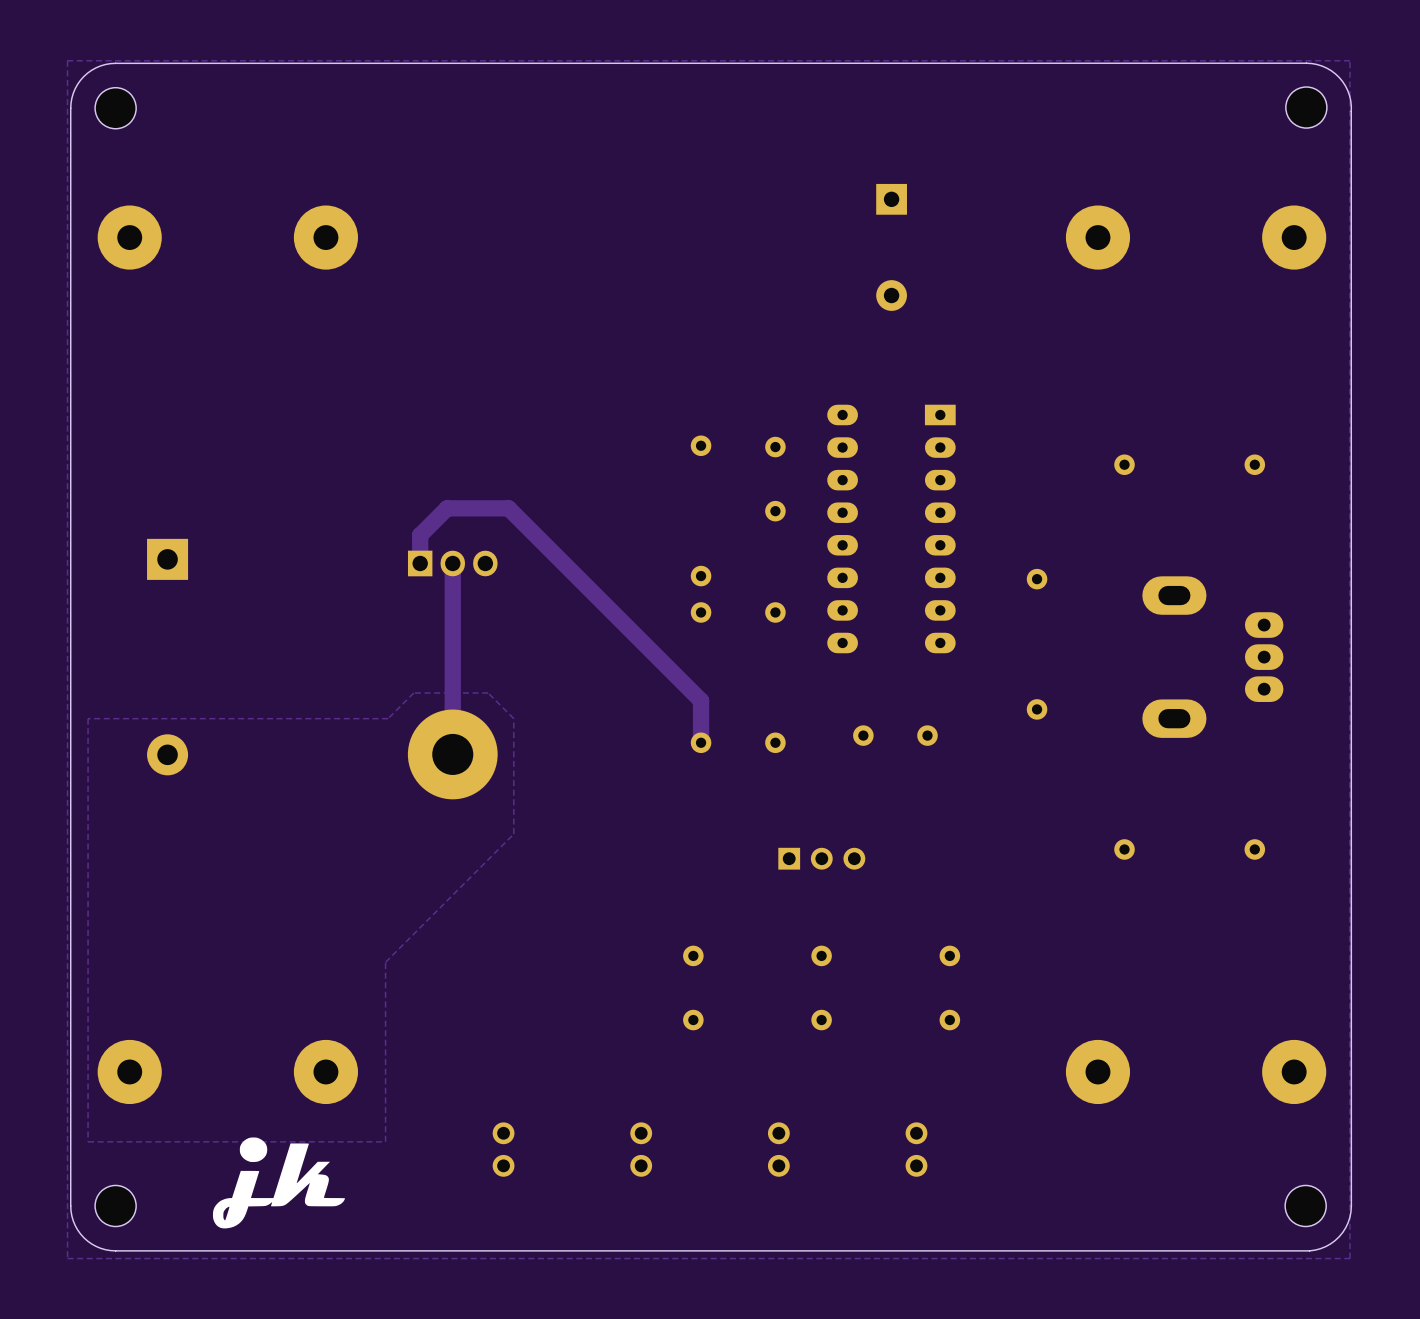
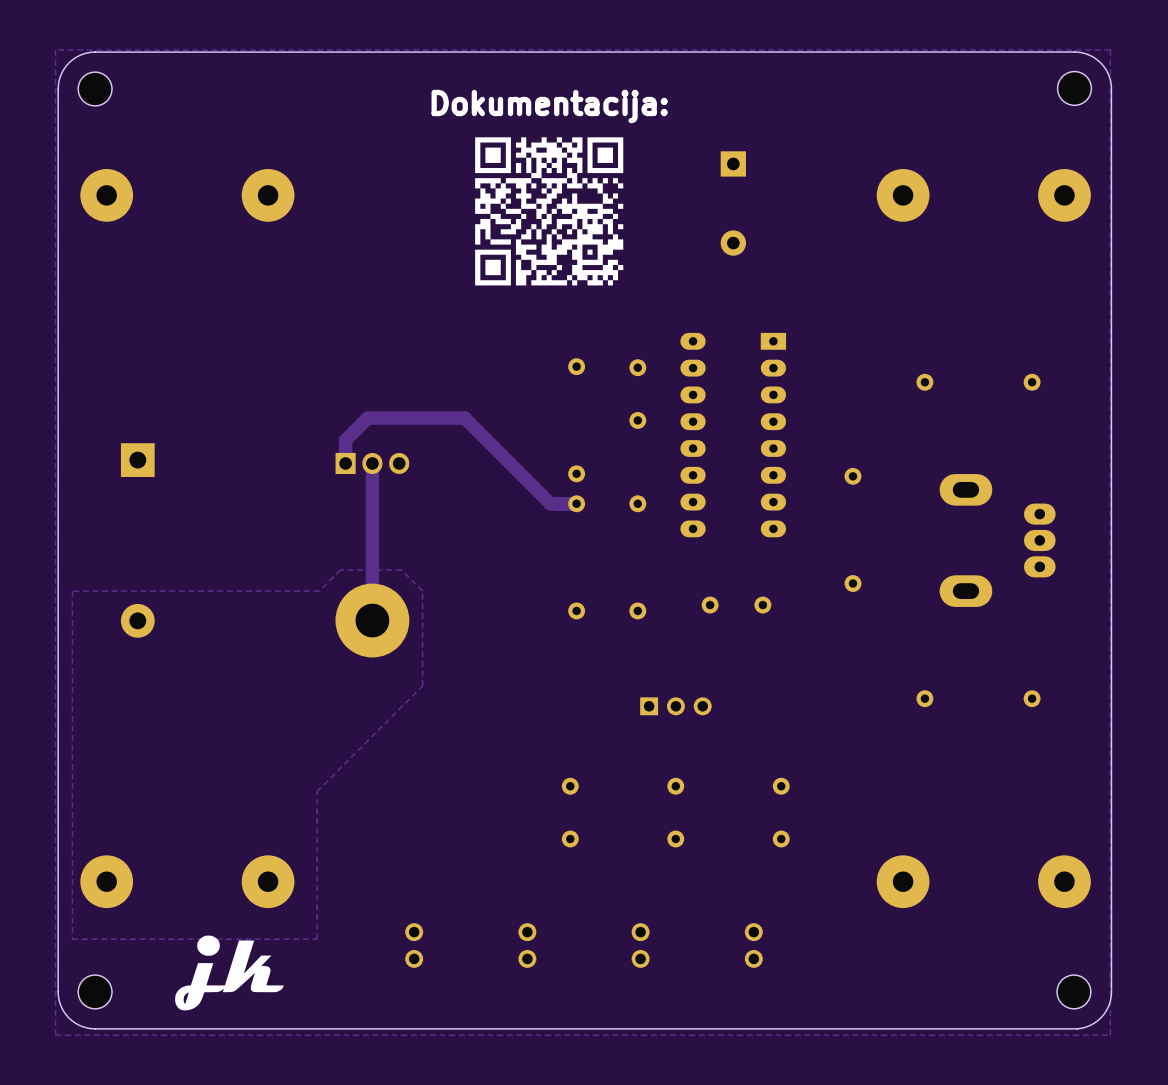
text: none -> Dokumentacija: (549, 106)
drawing: none -> [475, 137, 624, 286]
track: (508, 508) (701, 700) (701, 742) -> (418, 418) (464, 418) (550, 503) (576, 503)

